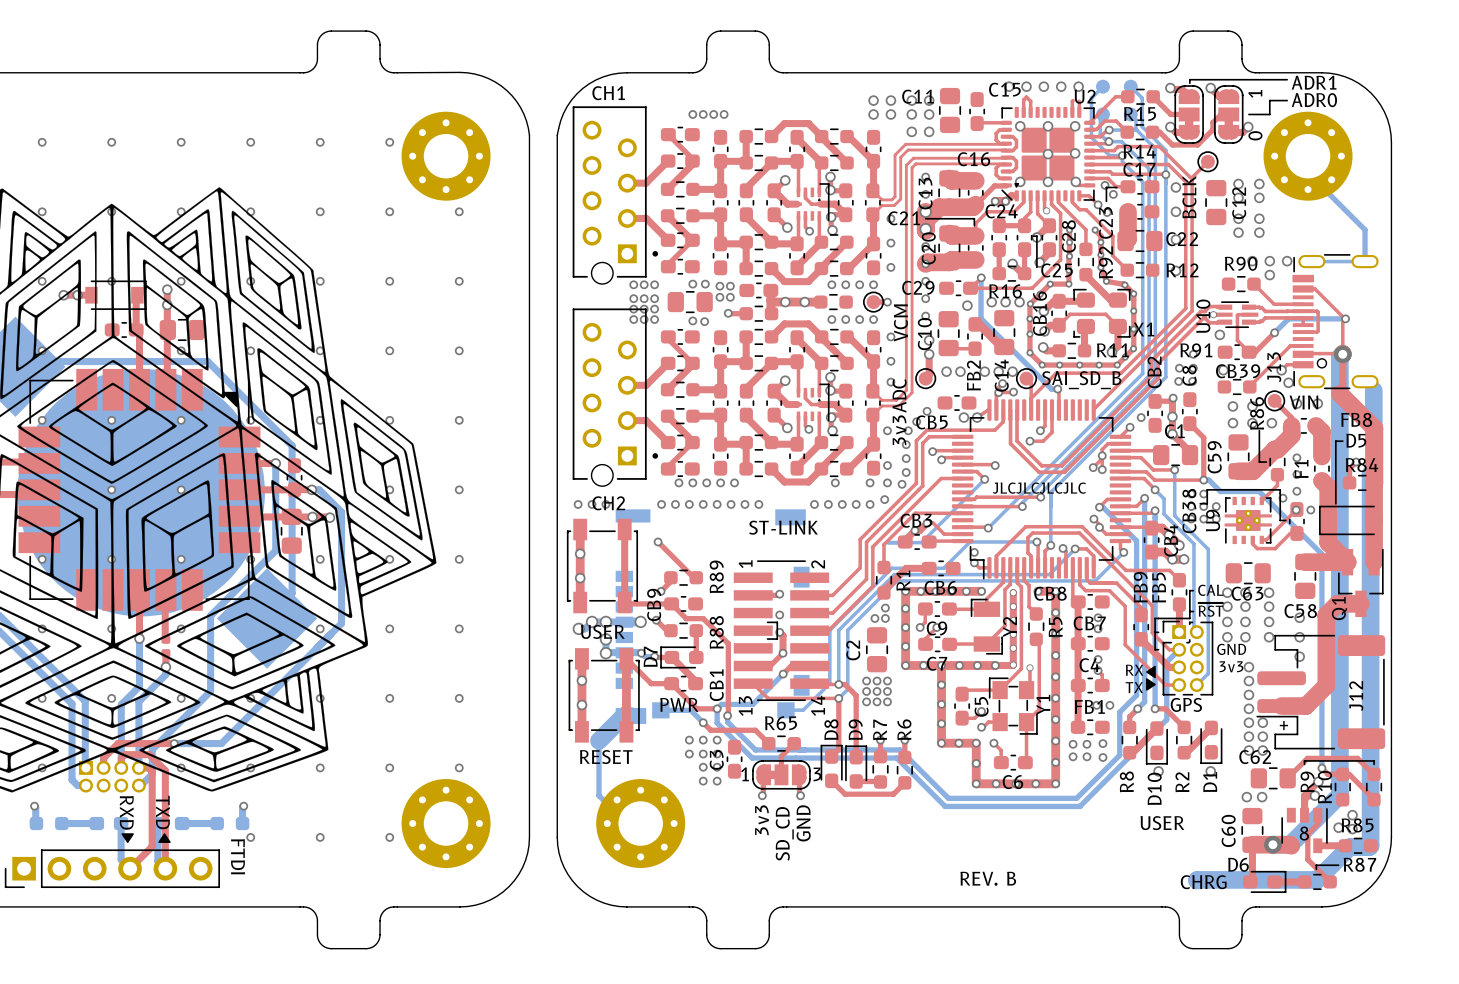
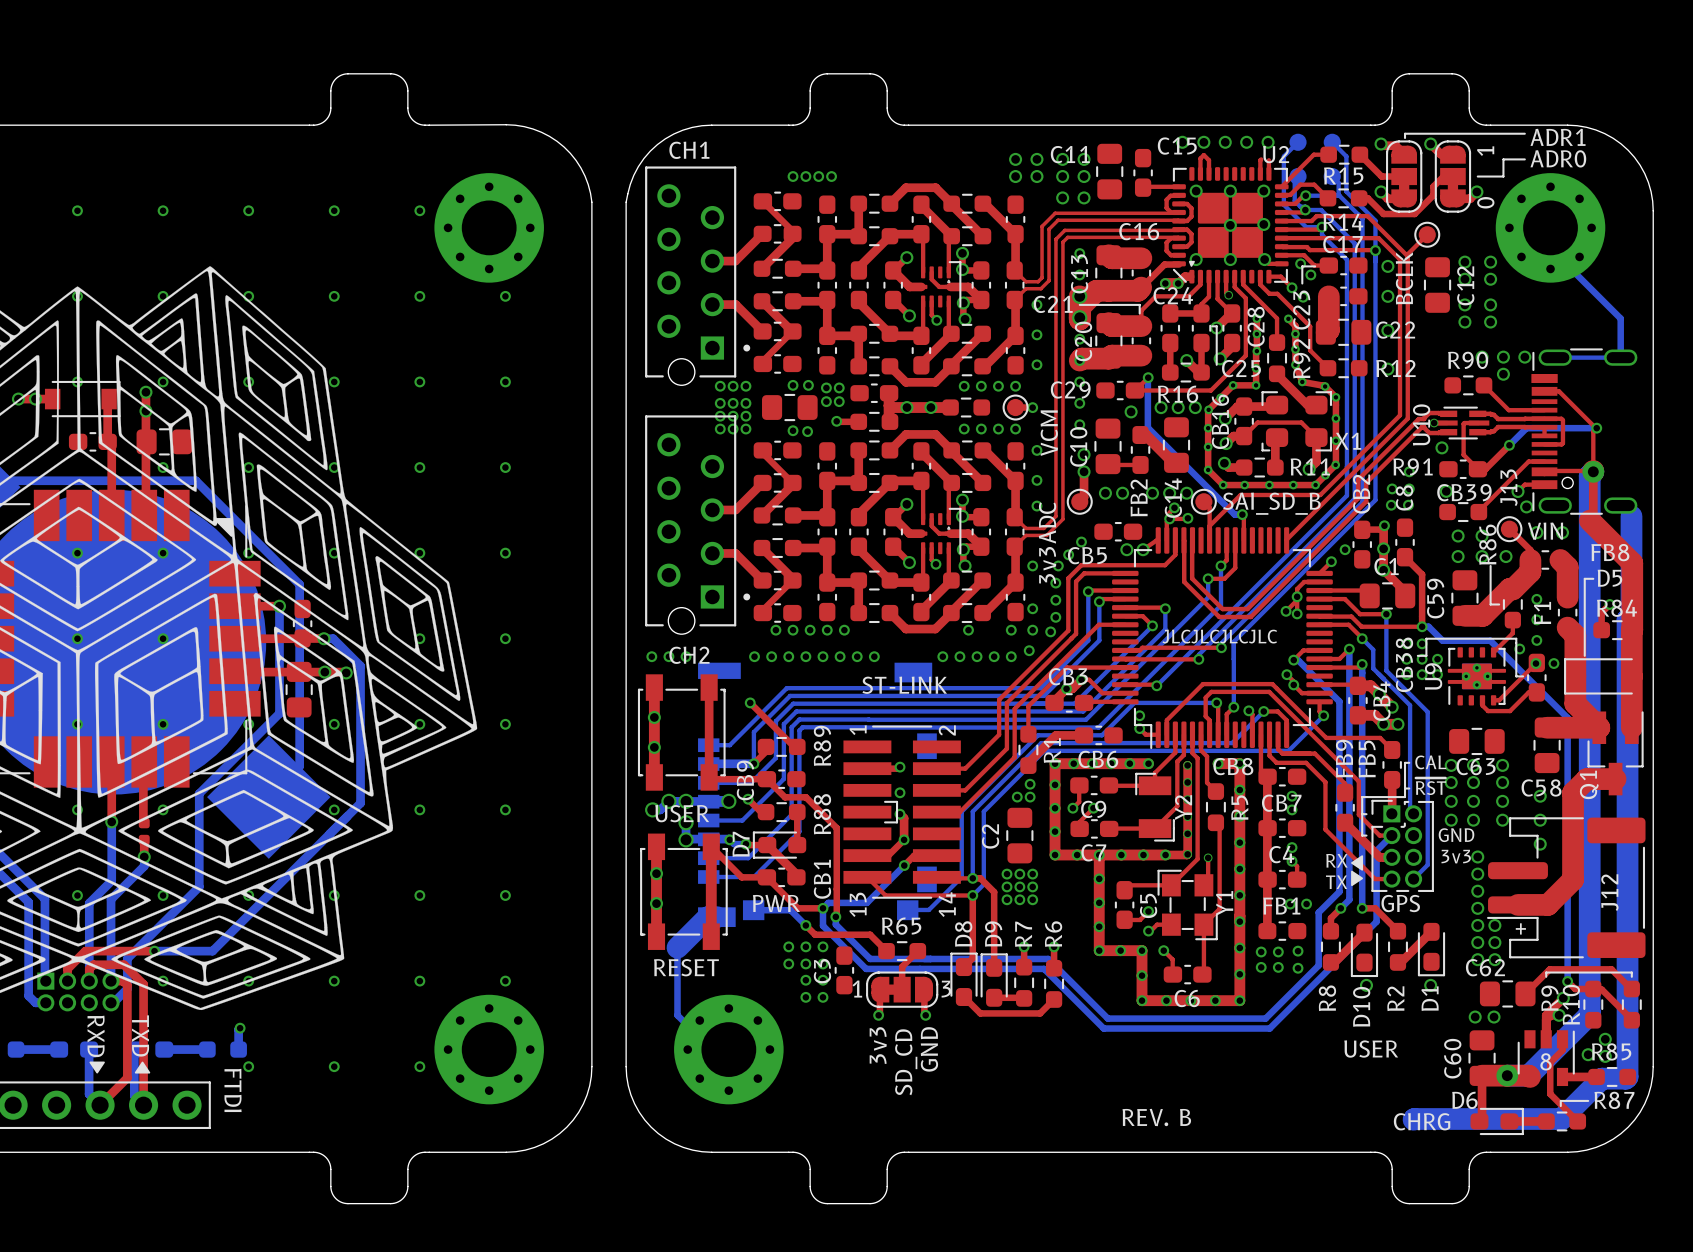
bottom track: none -> (1220, 565) (1220, 605) (1098, 727) (802, 727) (799, 730) (799, 831) (754, 877) (708, 877)
bottom track: none -> (1208, 578) (1208, 597) (1085, 719) (799, 719) (791, 727) (791, 814) (748, 858) (708, 858)
bottom track: none -> (1088, 591) (1088, 640) (1040, 688) (786, 688) (729, 745) (708, 745)
bottom track: none -> (1099, 601) (1099, 640) (1043, 695) (790, 695) (753, 732) (753, 763)
bottom track: none -> (1165, 608) (1165, 629) (1083, 711) (796, 711) (783, 724) (783, 779) (742, 820) (708, 820)
bottom track: none -> (1033, 703) (793, 703) (775, 721) (775, 758) (751, 782) (708, 782)
bottom track: none -> (753, 763) (708, 763) (753, 763)

